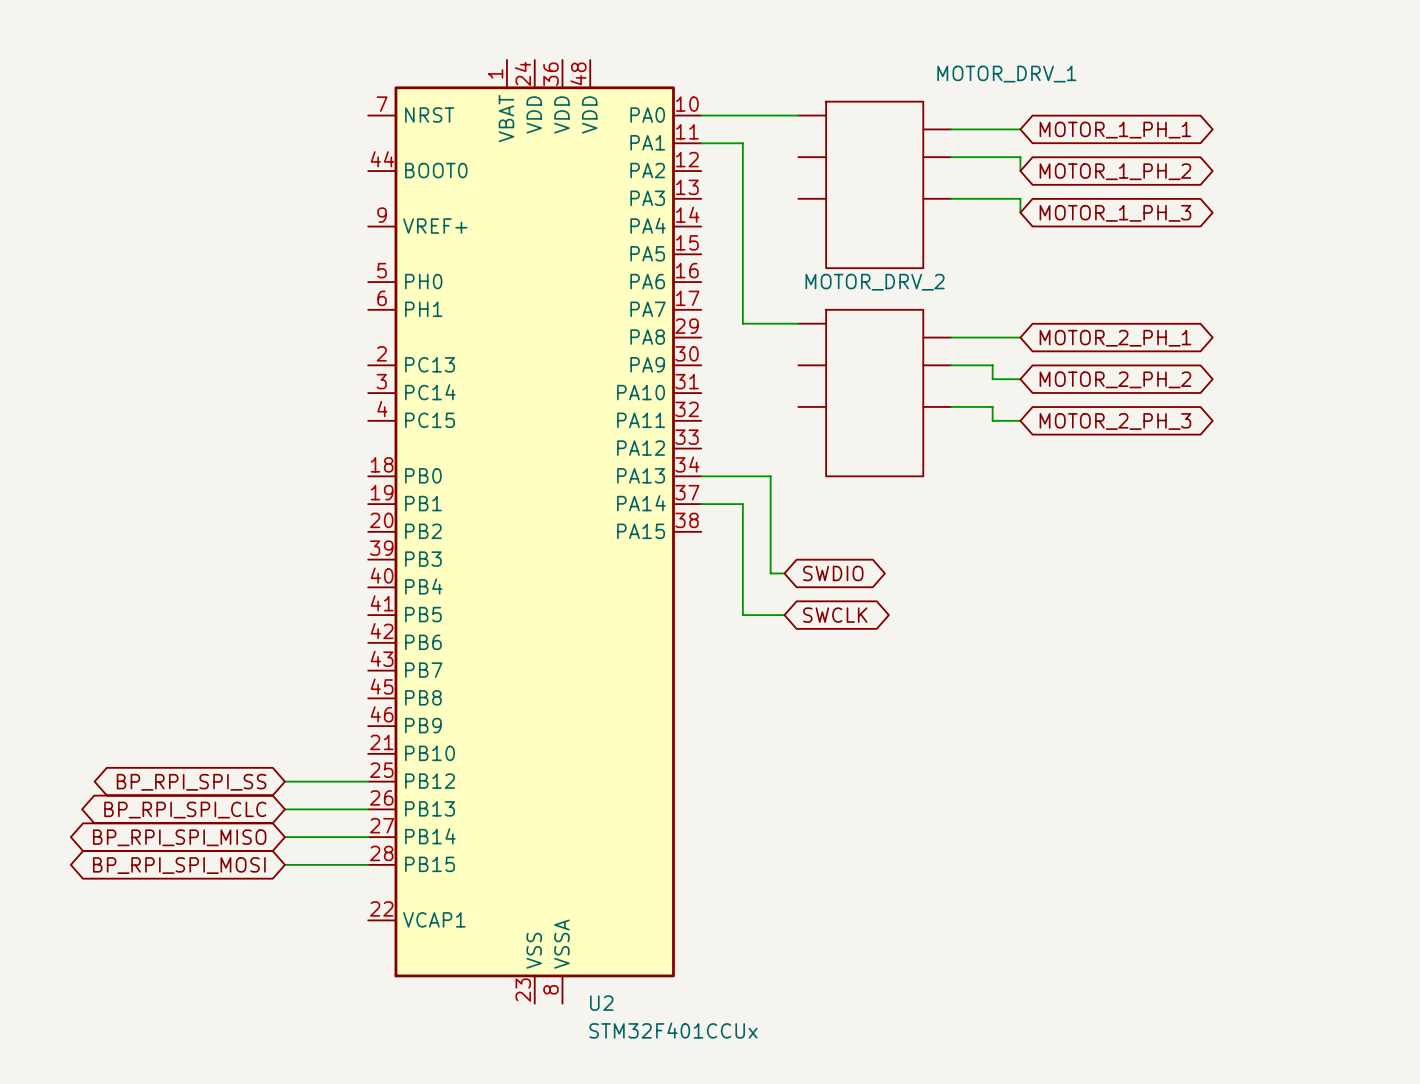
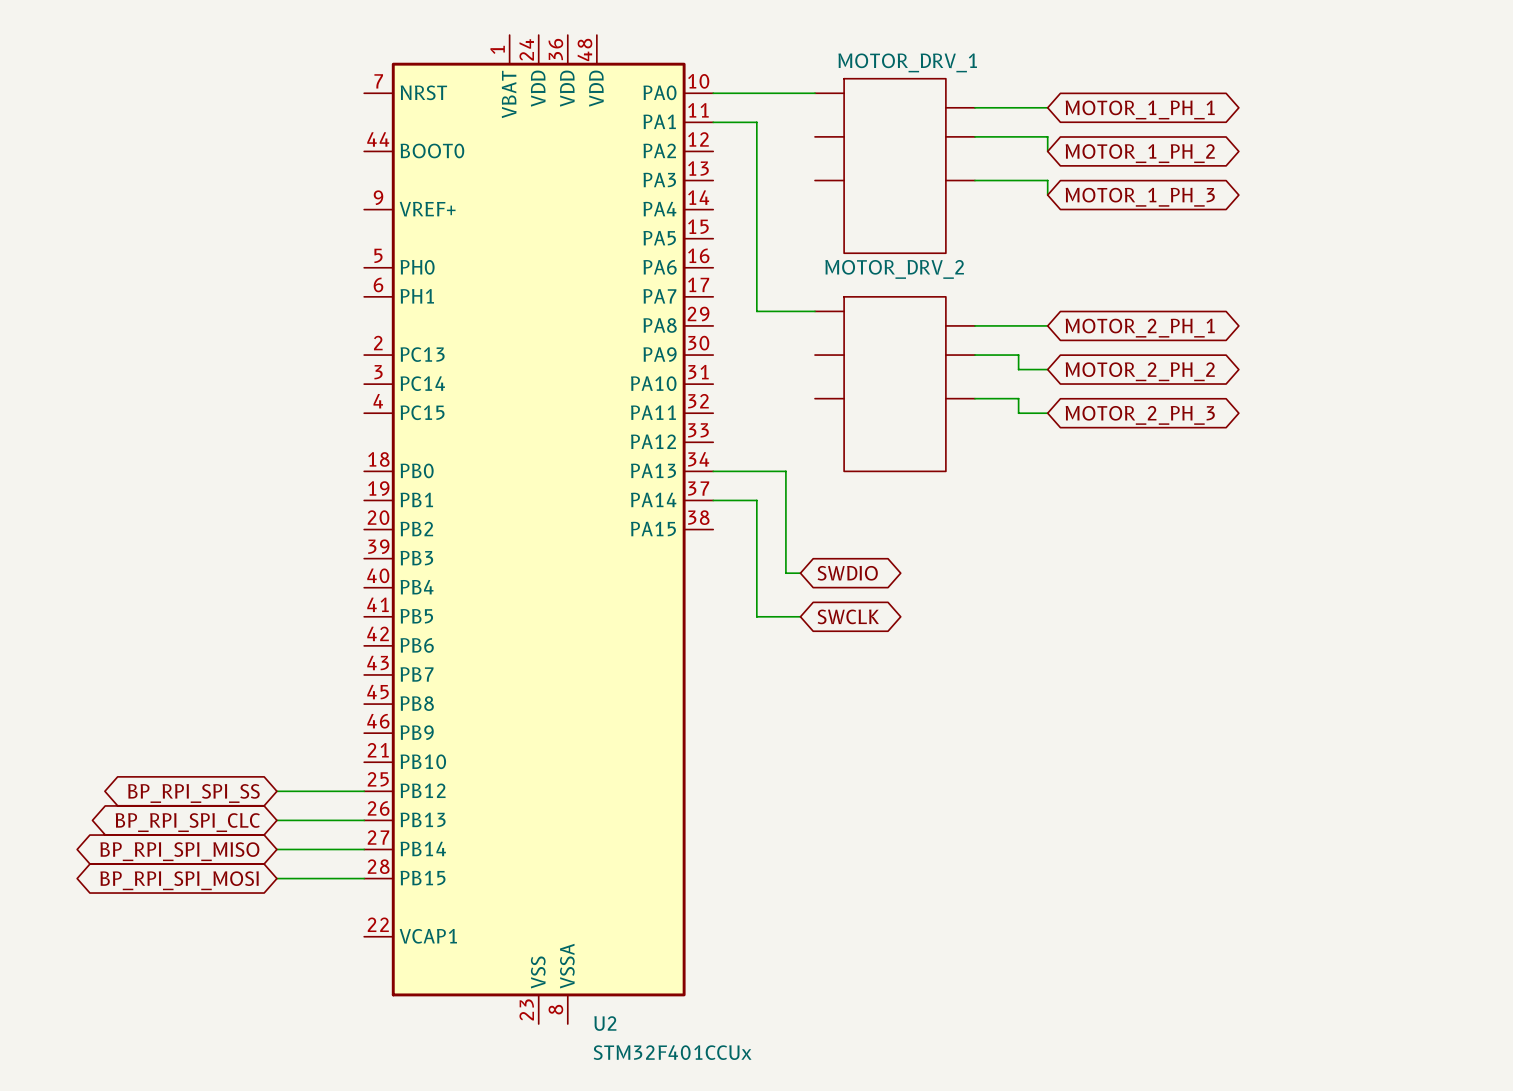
MOTOR_DRV_1 name position: MOTOR_DRV_1 (1006, 74) -> MOTOR_DRV_1 (907, 62)

